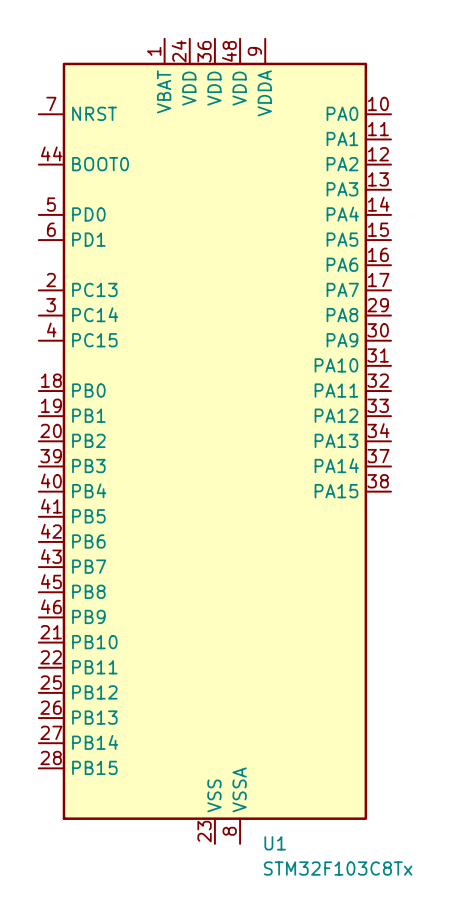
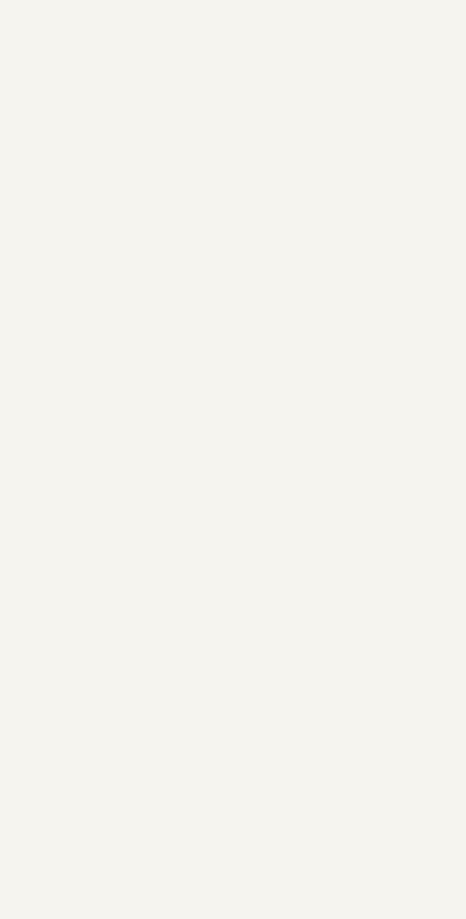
U1: STM32F103C8Tx (214, 441) -> none

